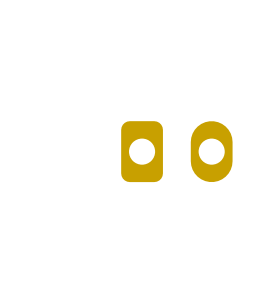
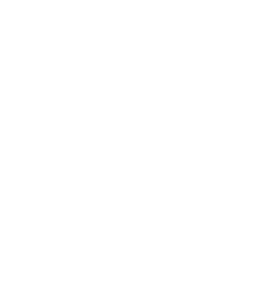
part: (176, 151) -> none

